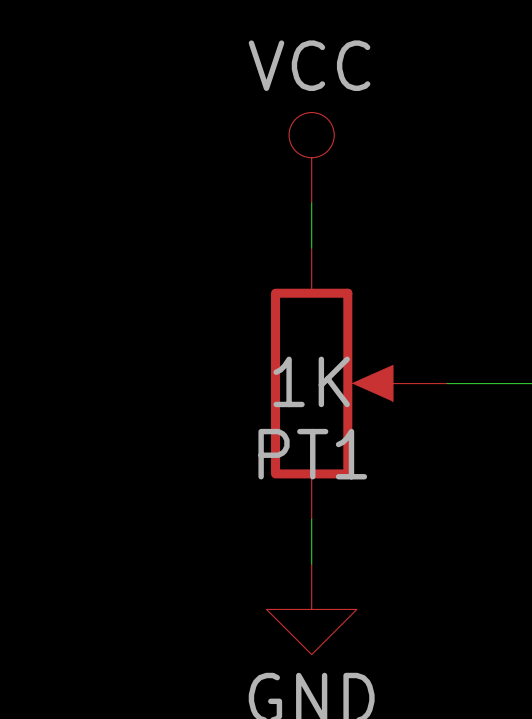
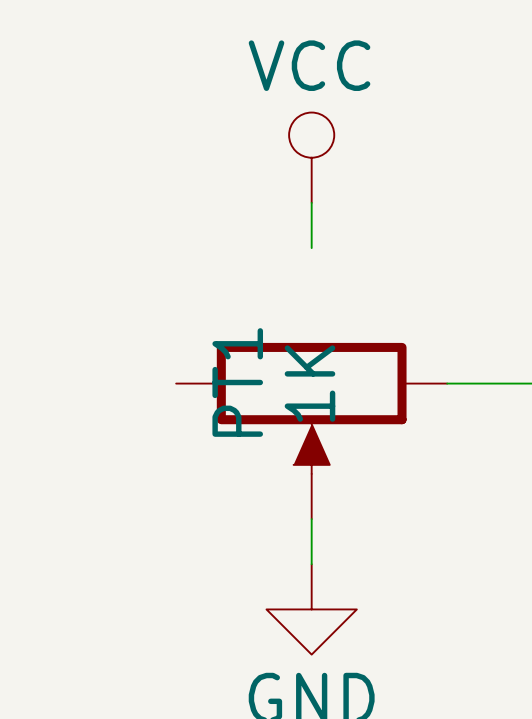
PT1 rotation: 0° (336, 383) -> 90° clockwise (311, 408)

